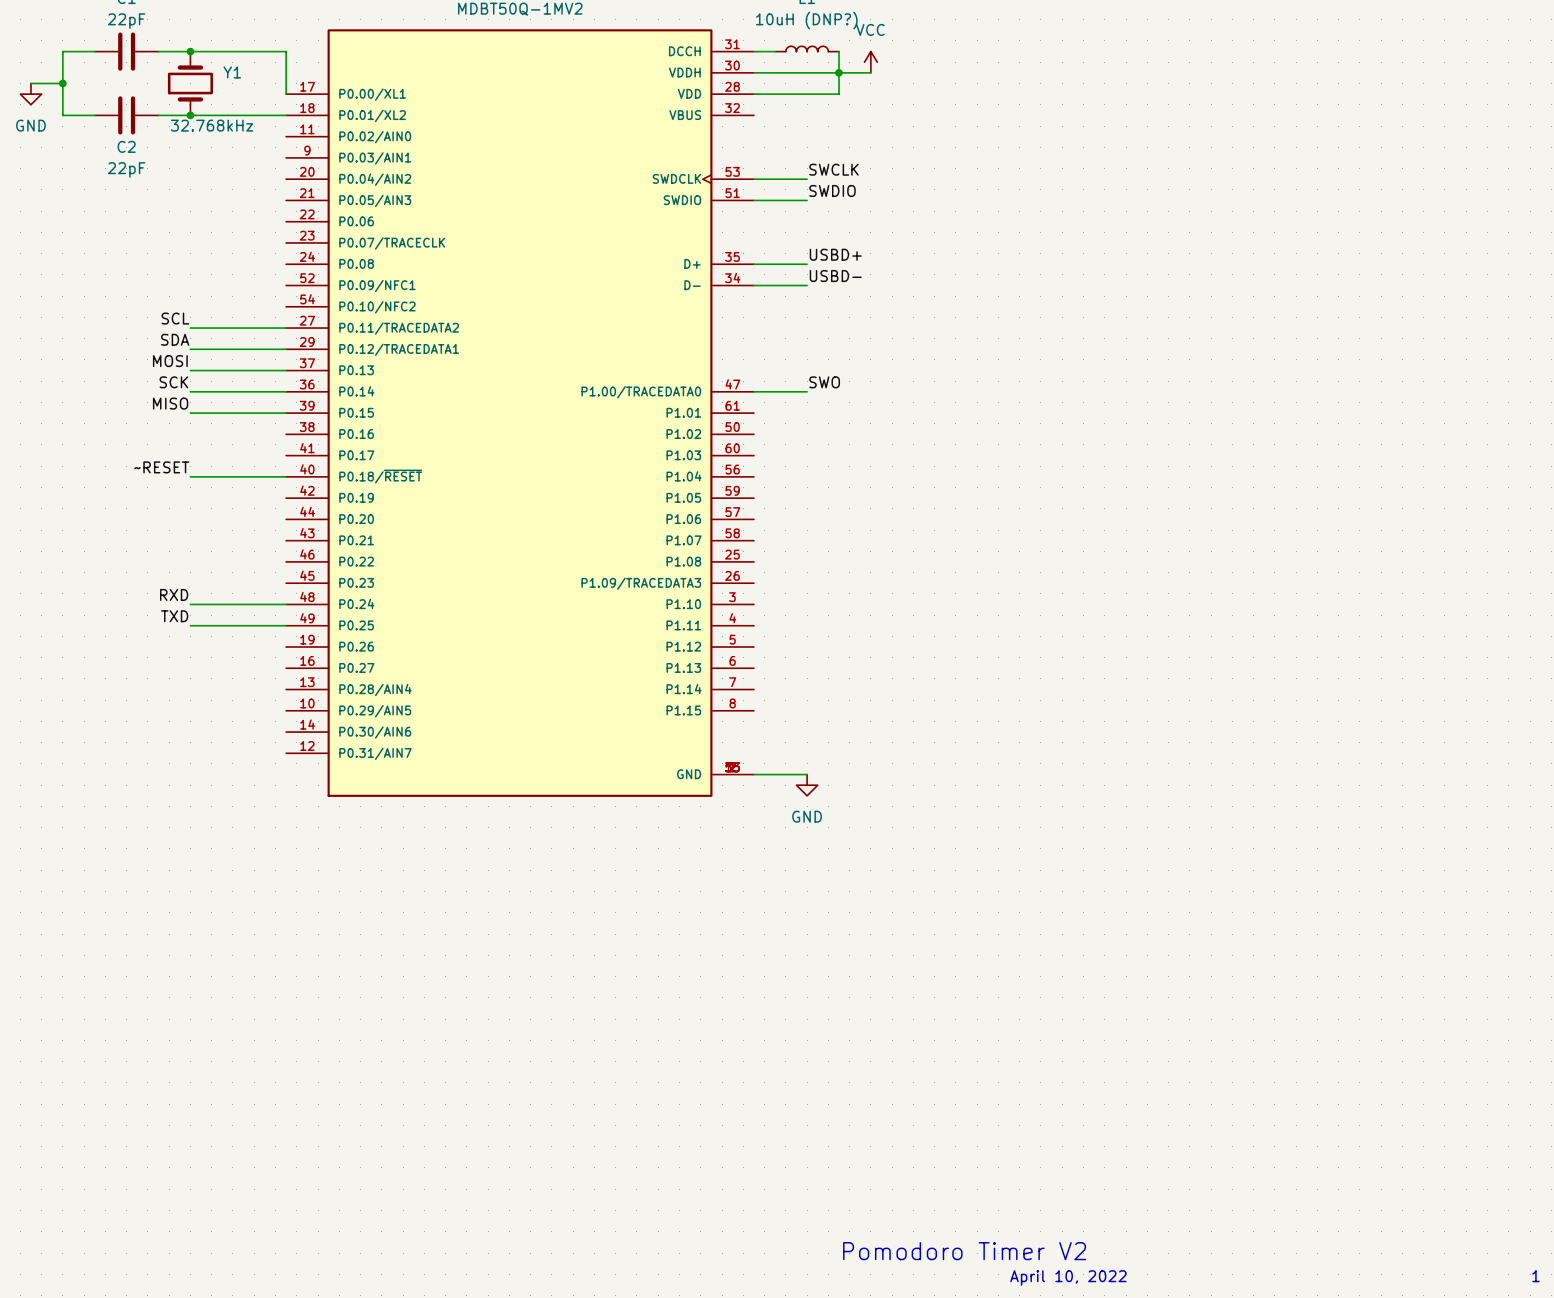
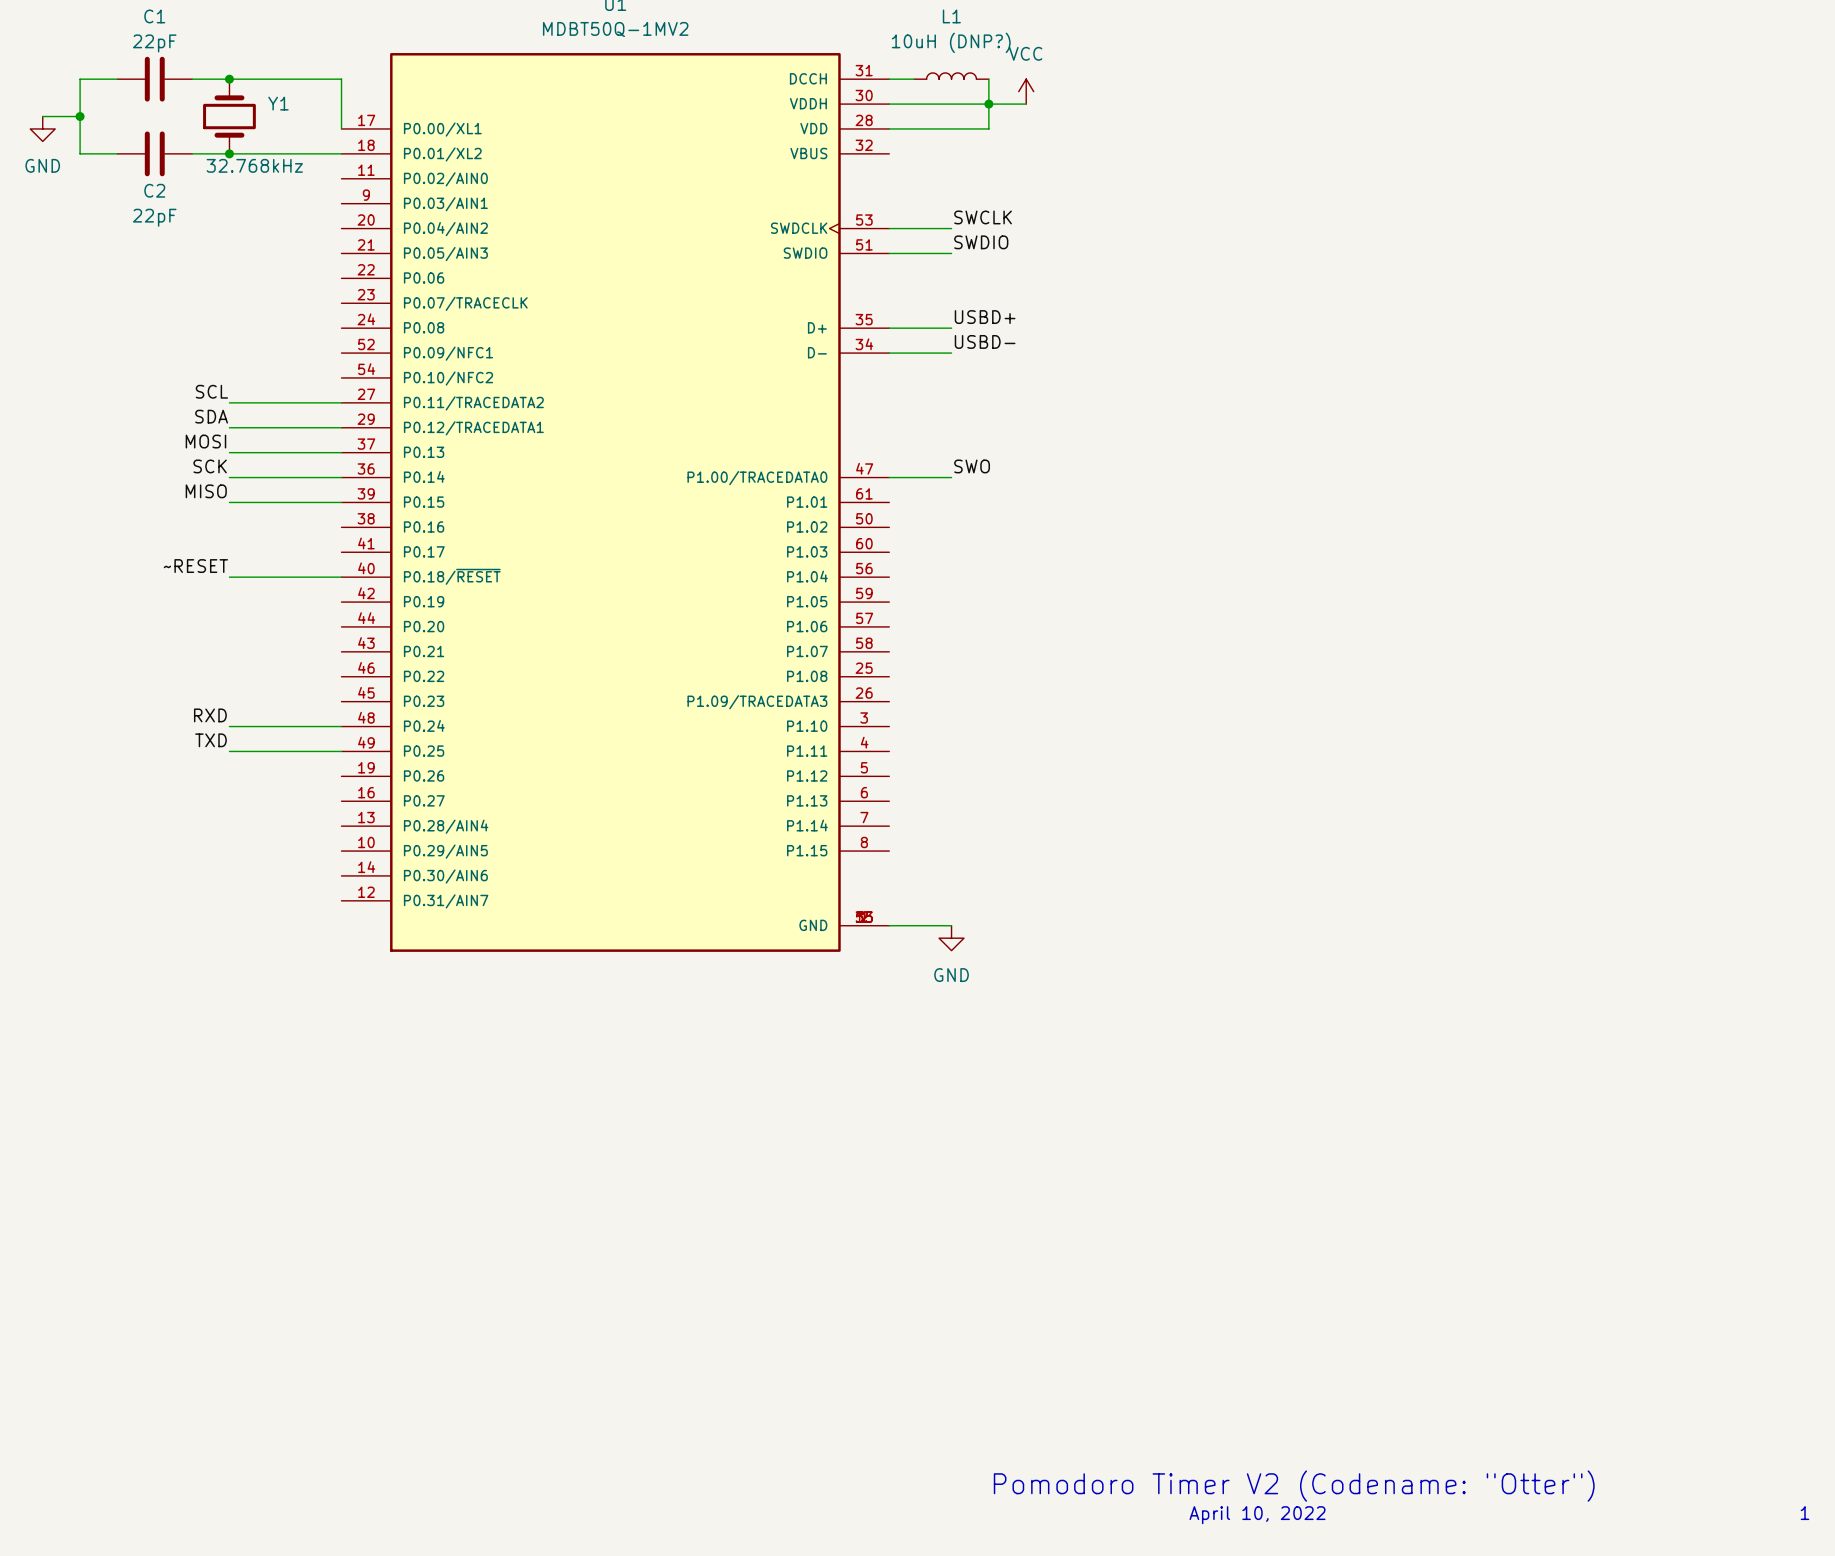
text: Pomodoro Timer V2 (964, 1251) -> Pomodoro Timer V2 (Codename: "Otter") (1294, 1486)

